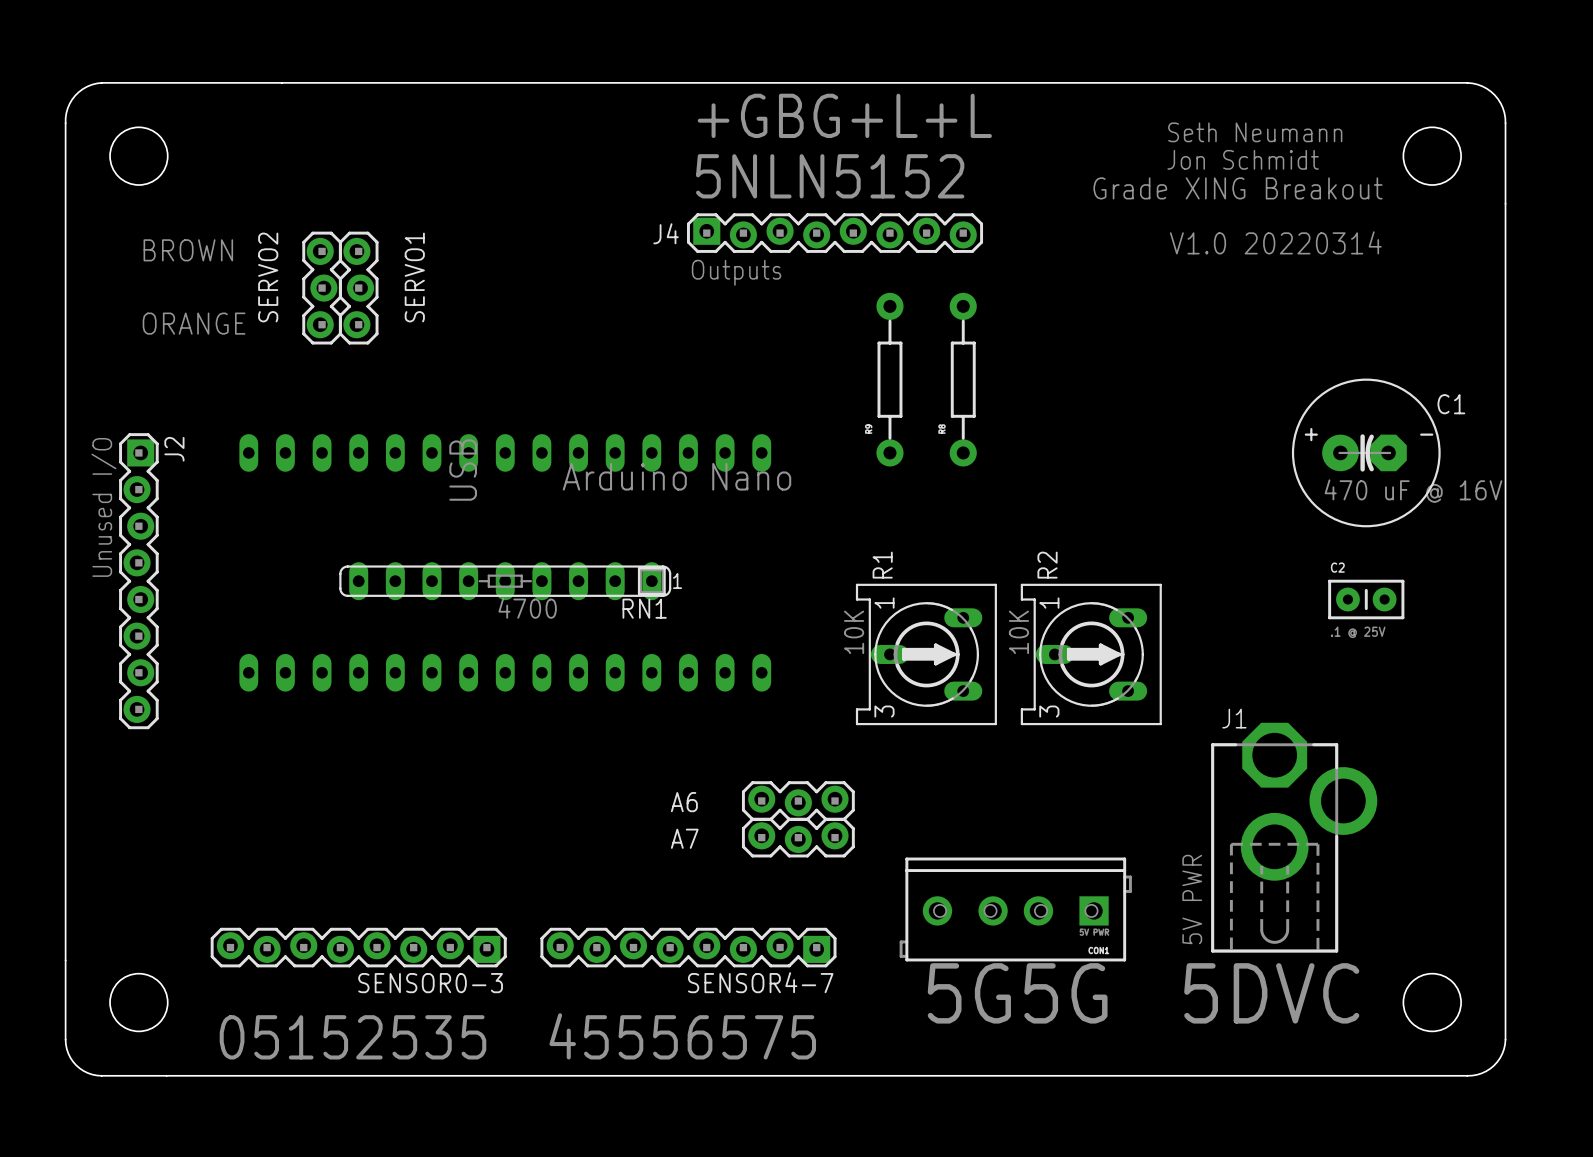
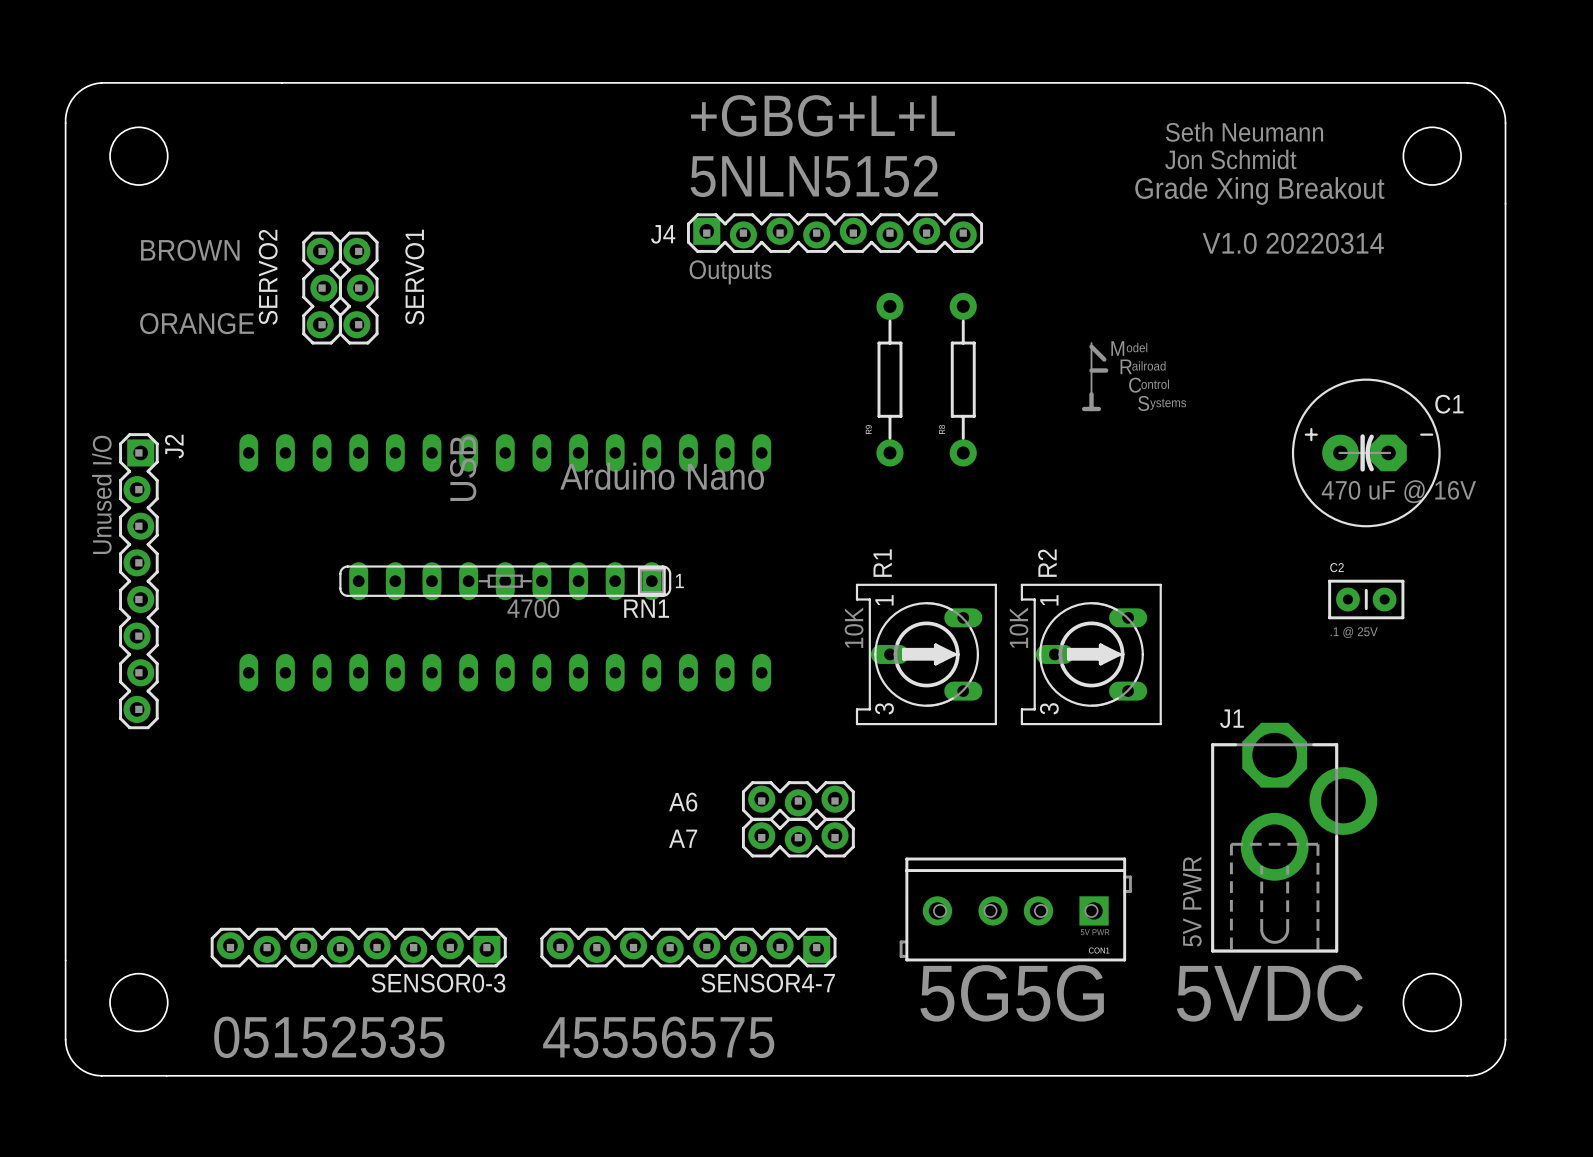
text: Grade XING Breakout (1237, 188) -> Grade Xing Breakout (1259, 190)
drawing: none -> [1081, 342, 1109, 412]
text: 5DVC (1271, 993) -> 5VDC (1269, 993)

